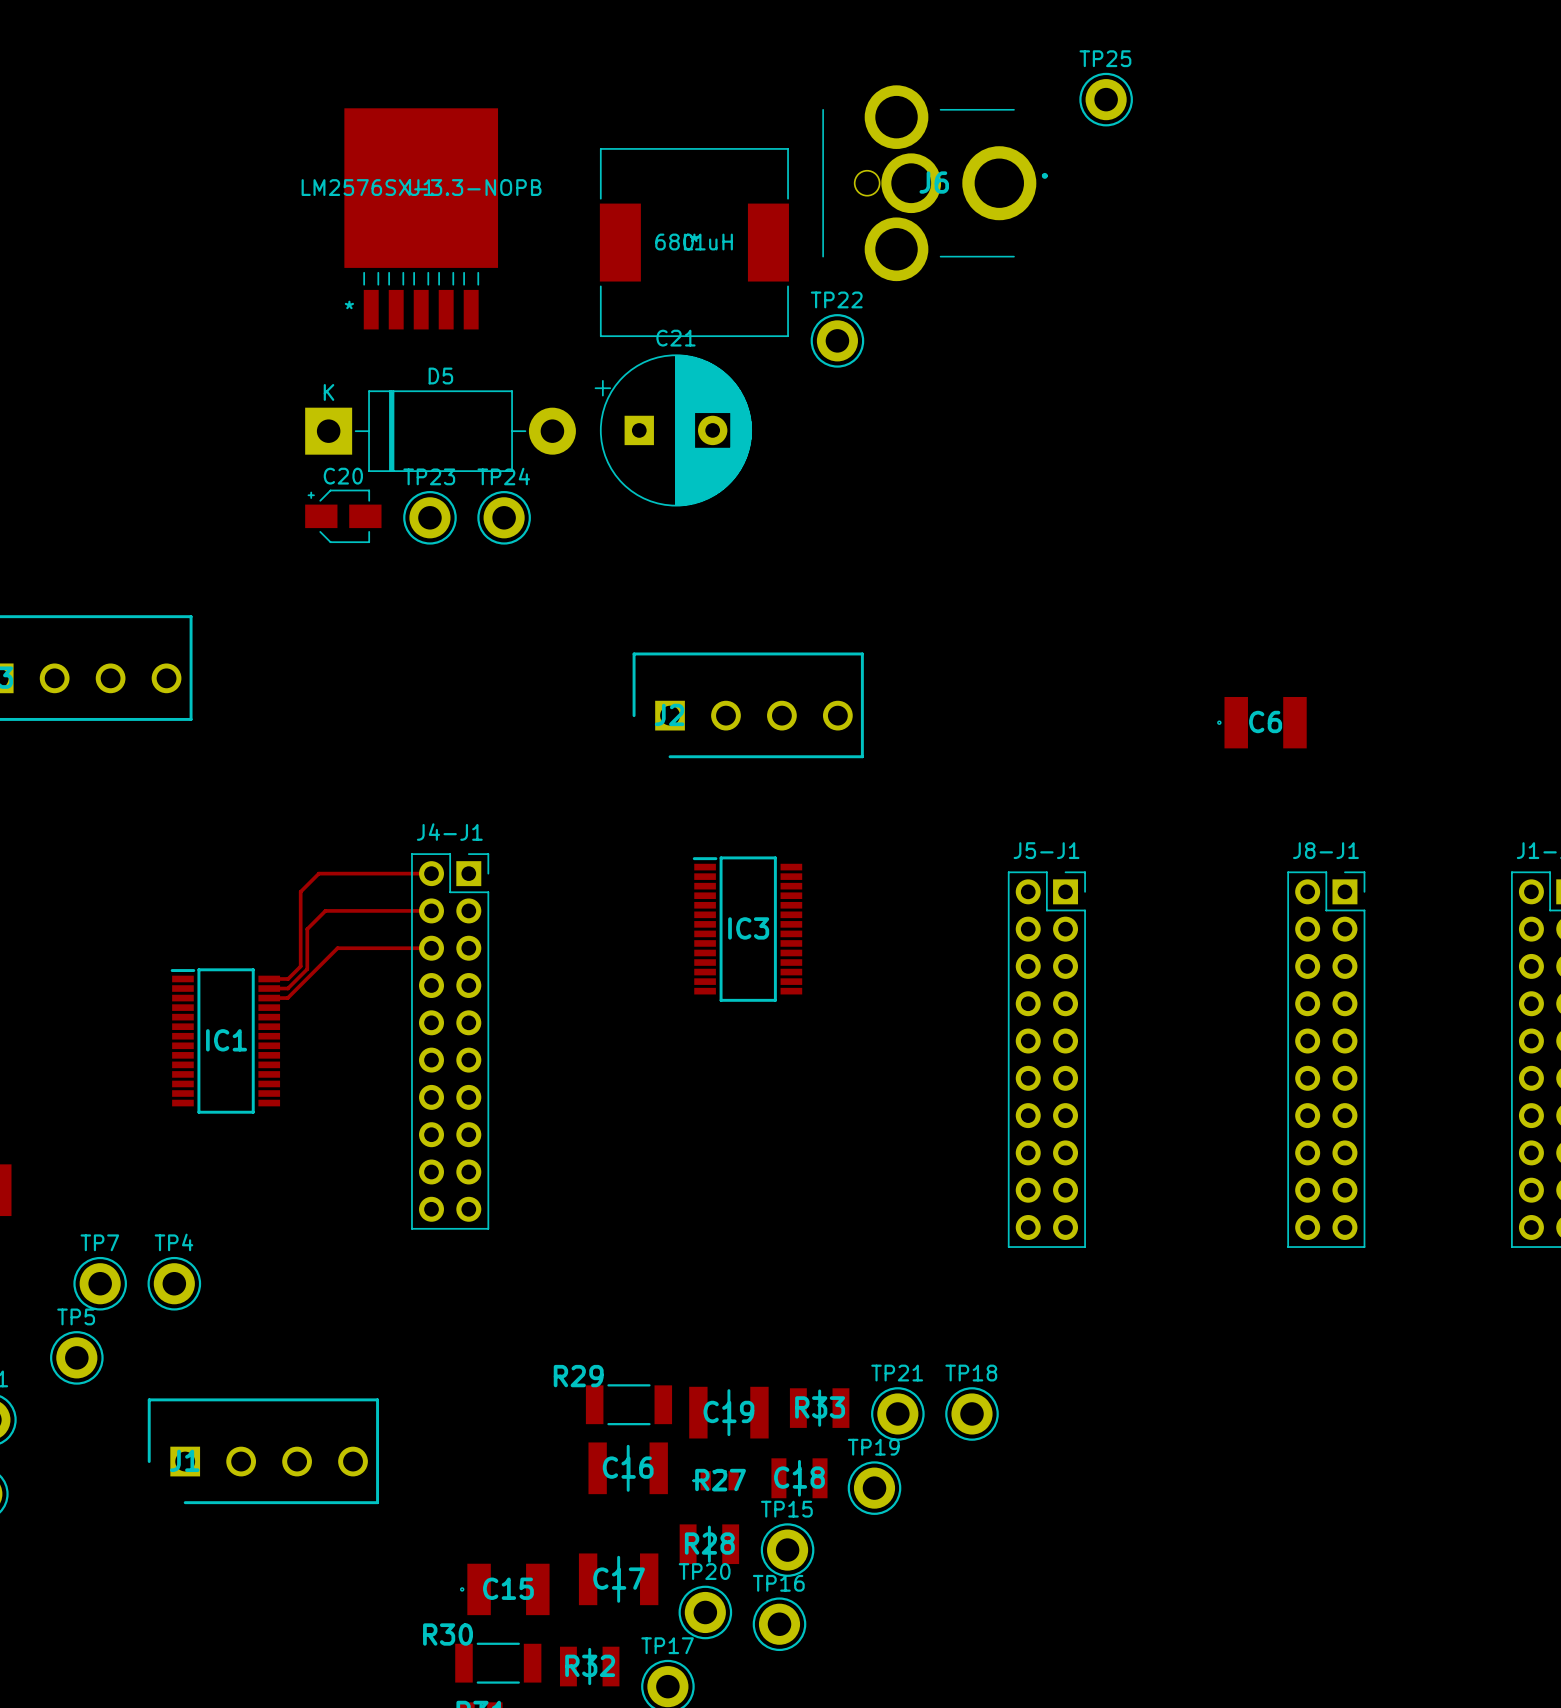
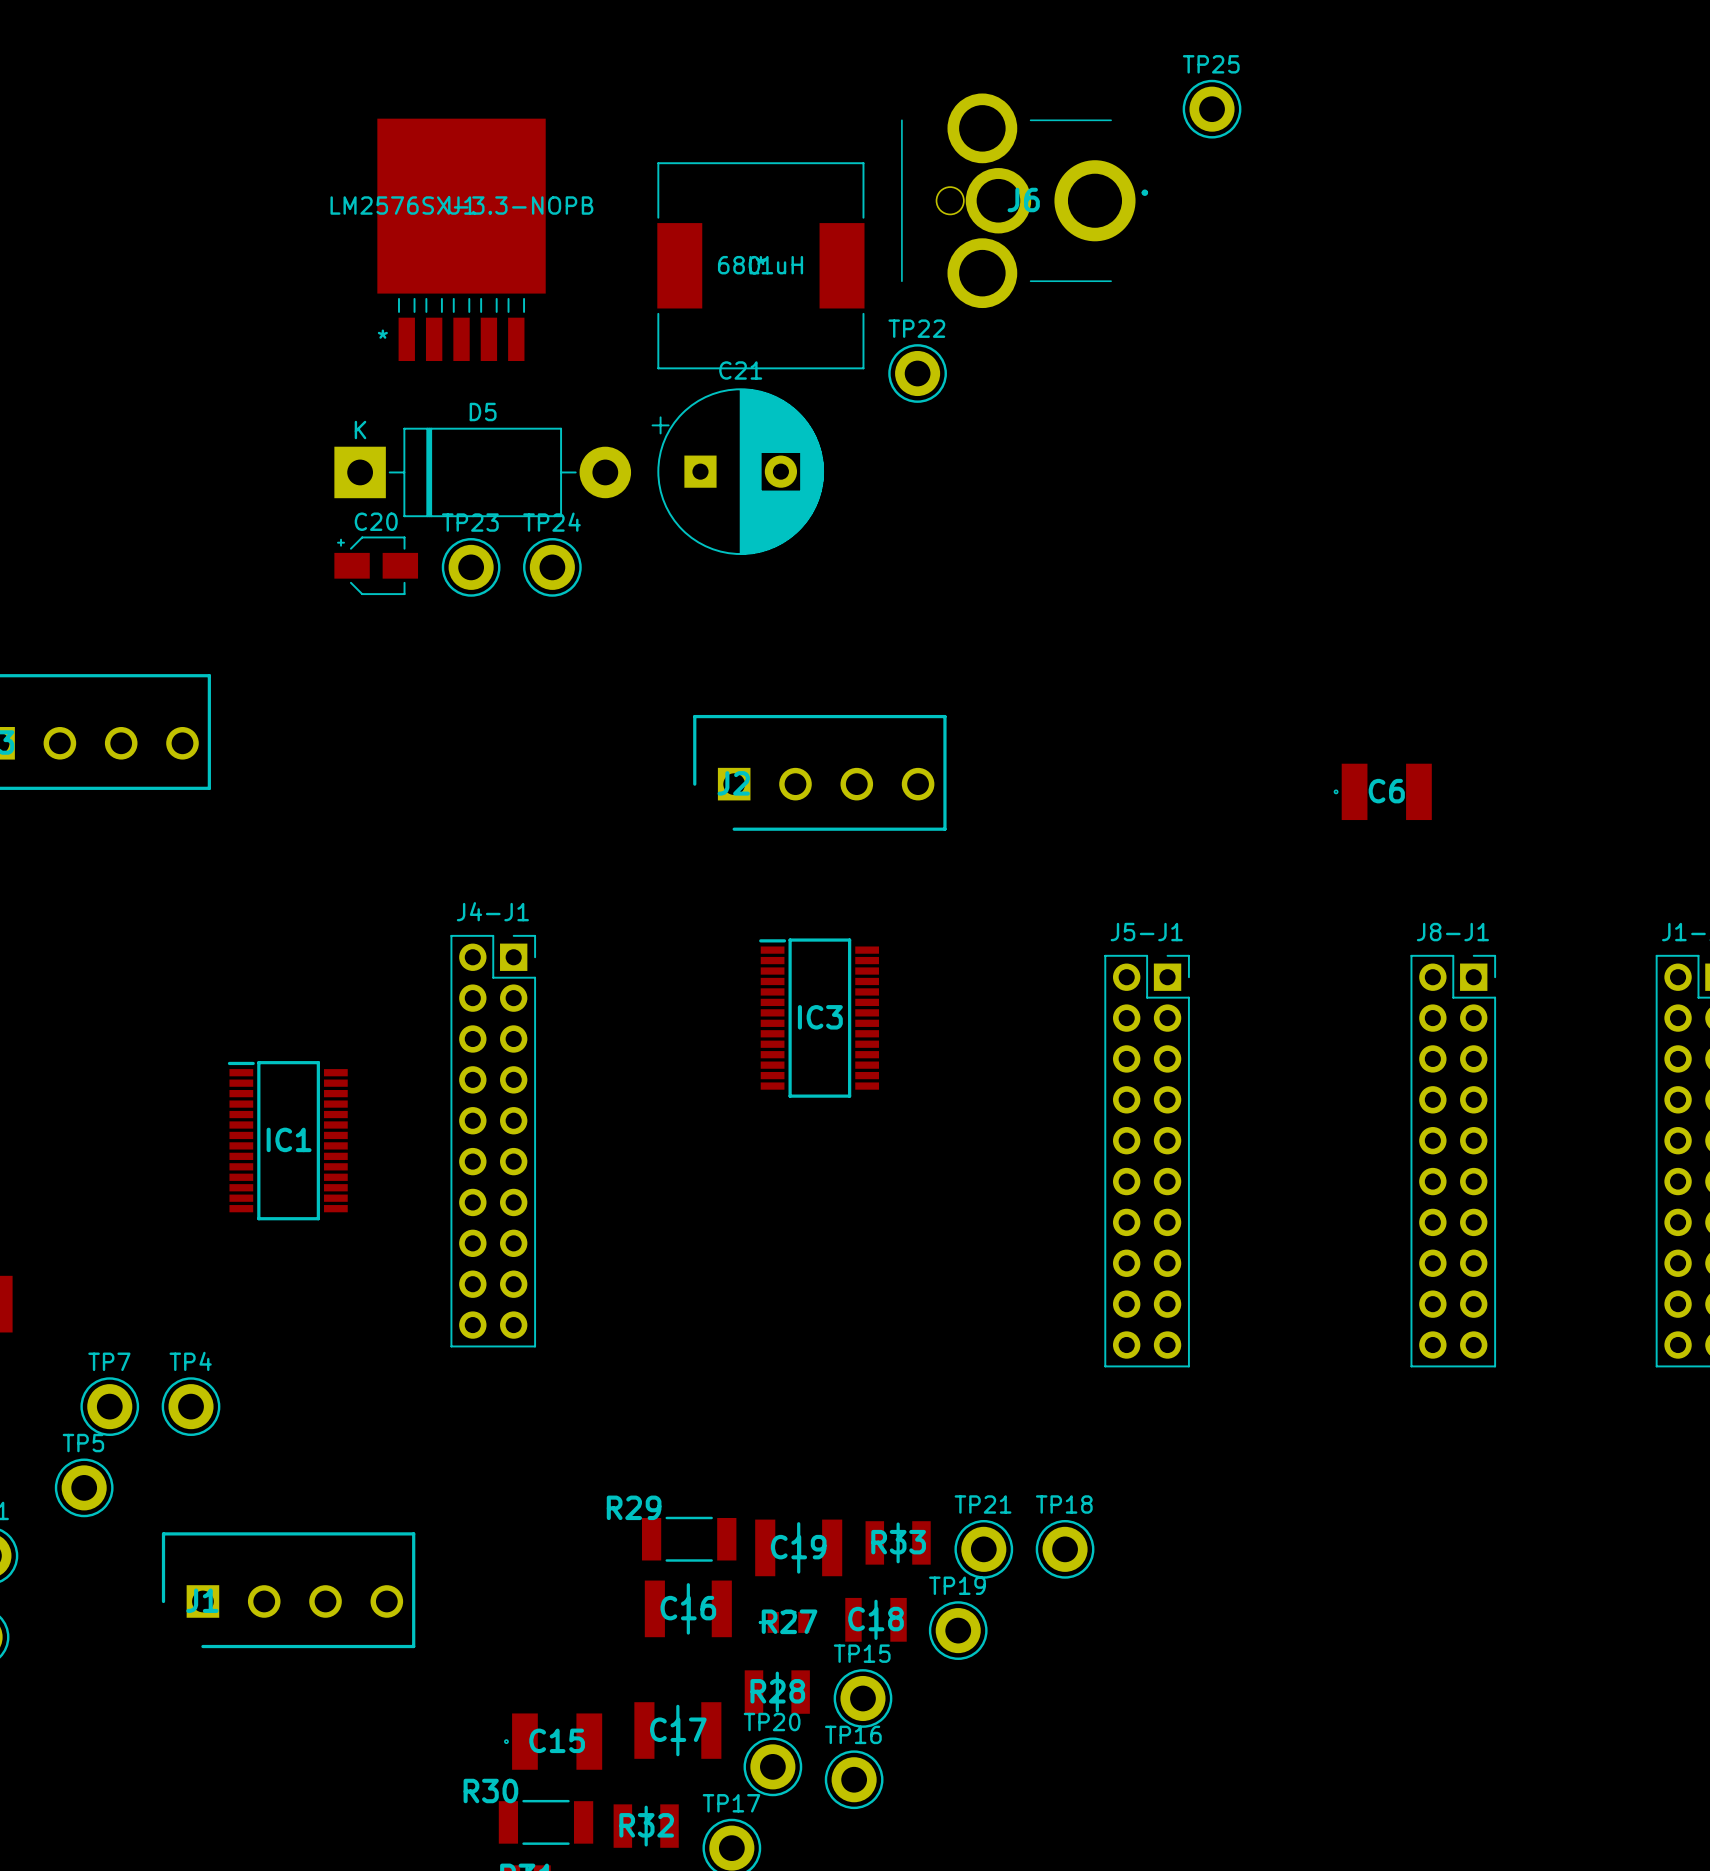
top track: (431, 873) (318, 873) (300, 891) (300, 966) (288, 978) (269, 978) -> none
top track: (431, 910) (325, 910) (307, 929) (307, 969) (287, 988) (269, 988) -> none
top track: (431, 948) (337, 948) (287, 998) (269, 998) -> none
IC1 position: (225, 1041) -> (287, 1140)

